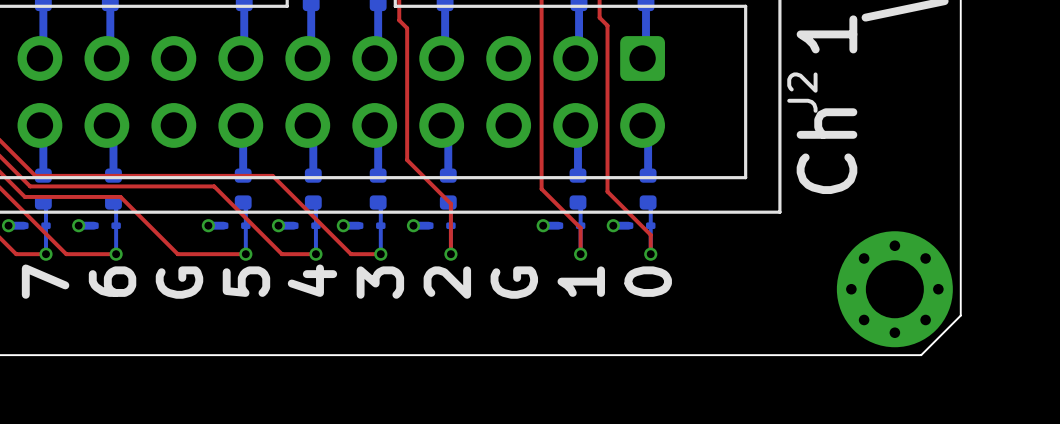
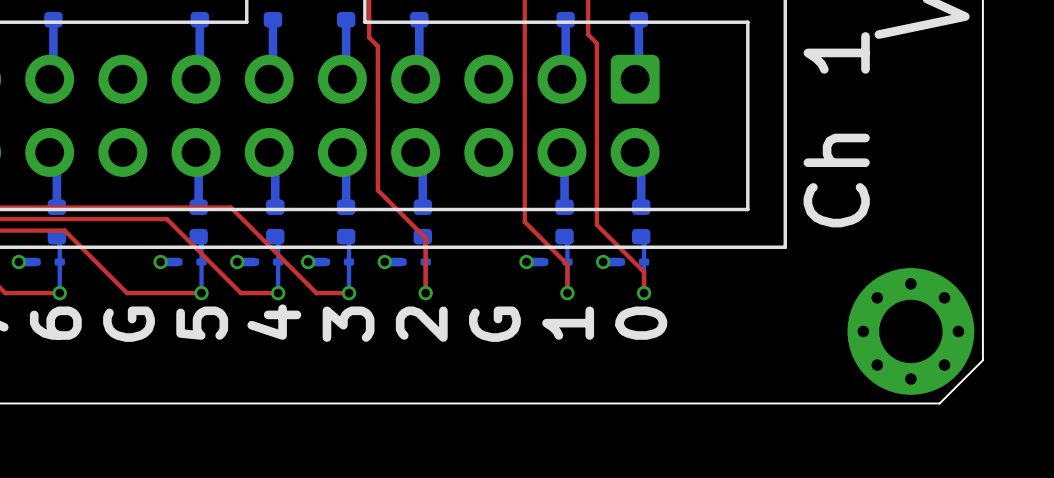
J2 name: J2 (802, 92) -> none

